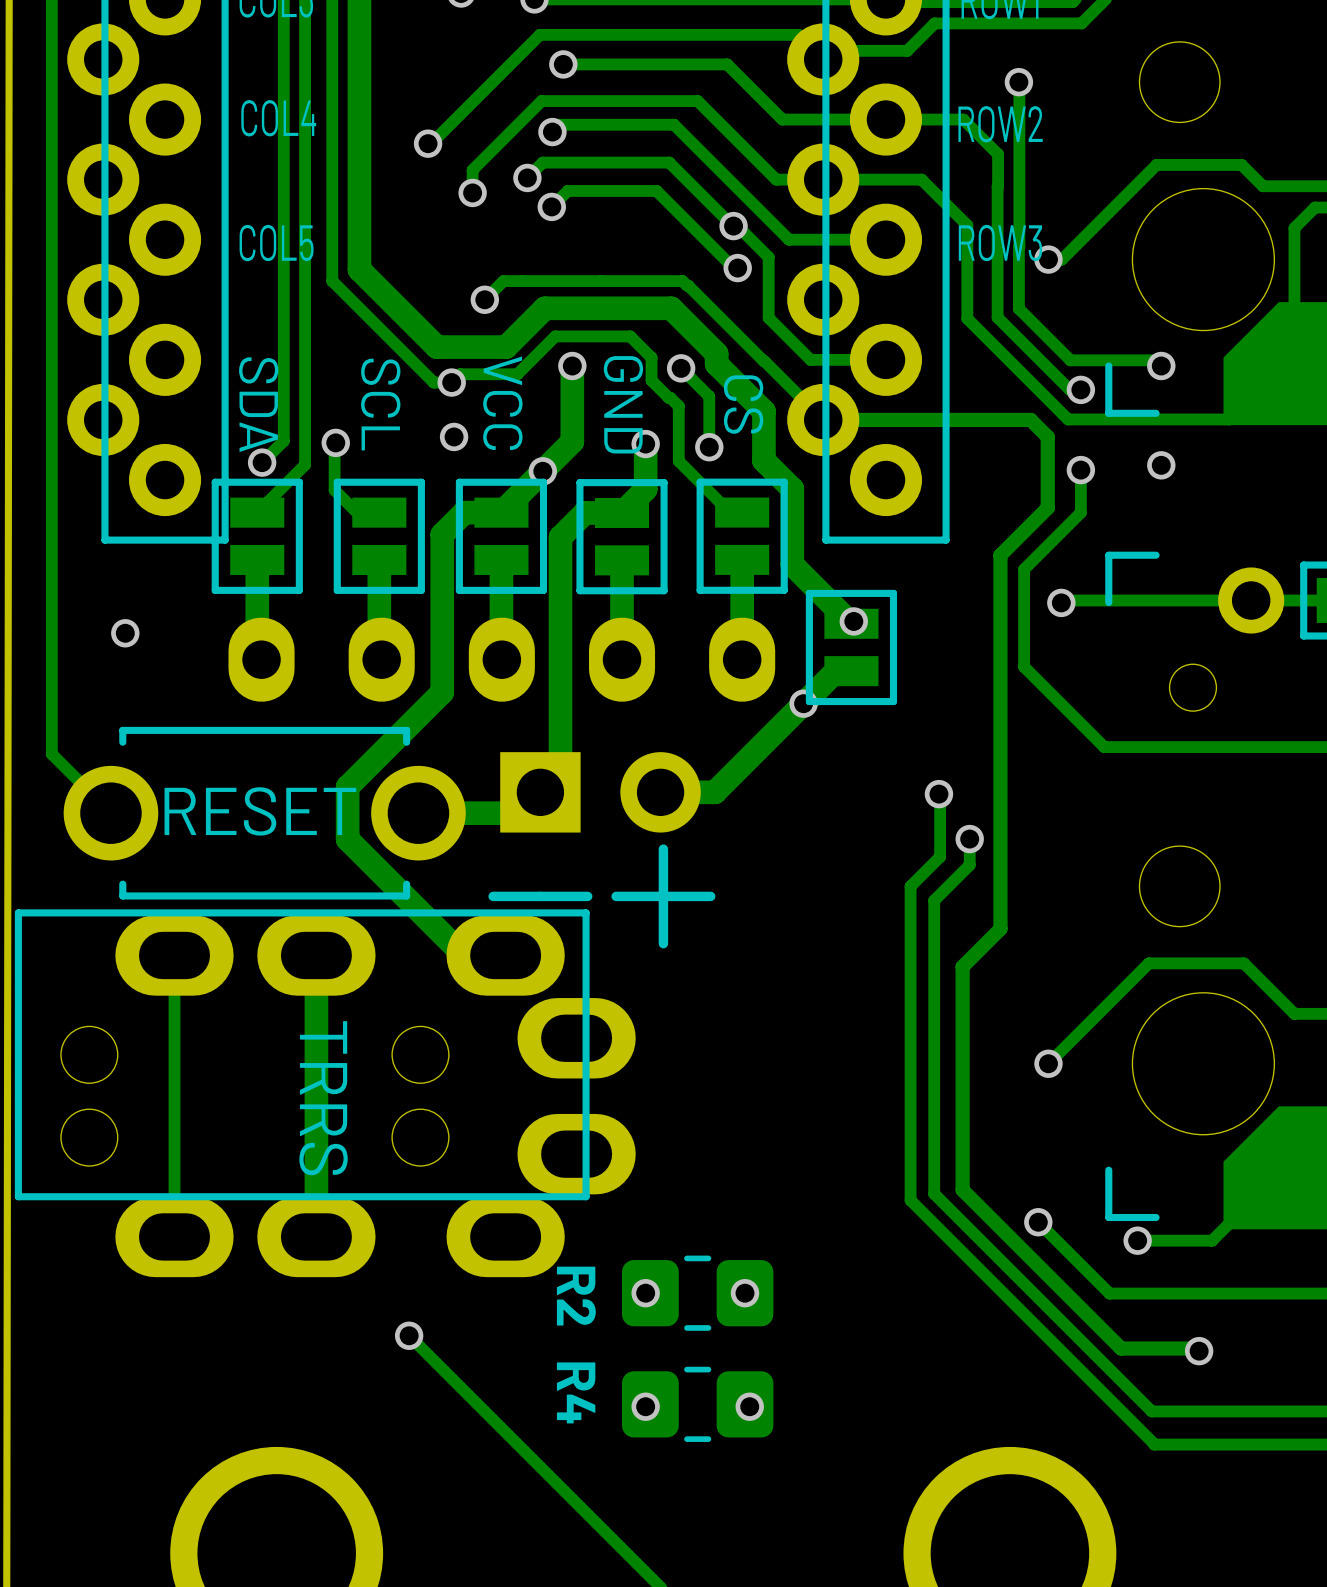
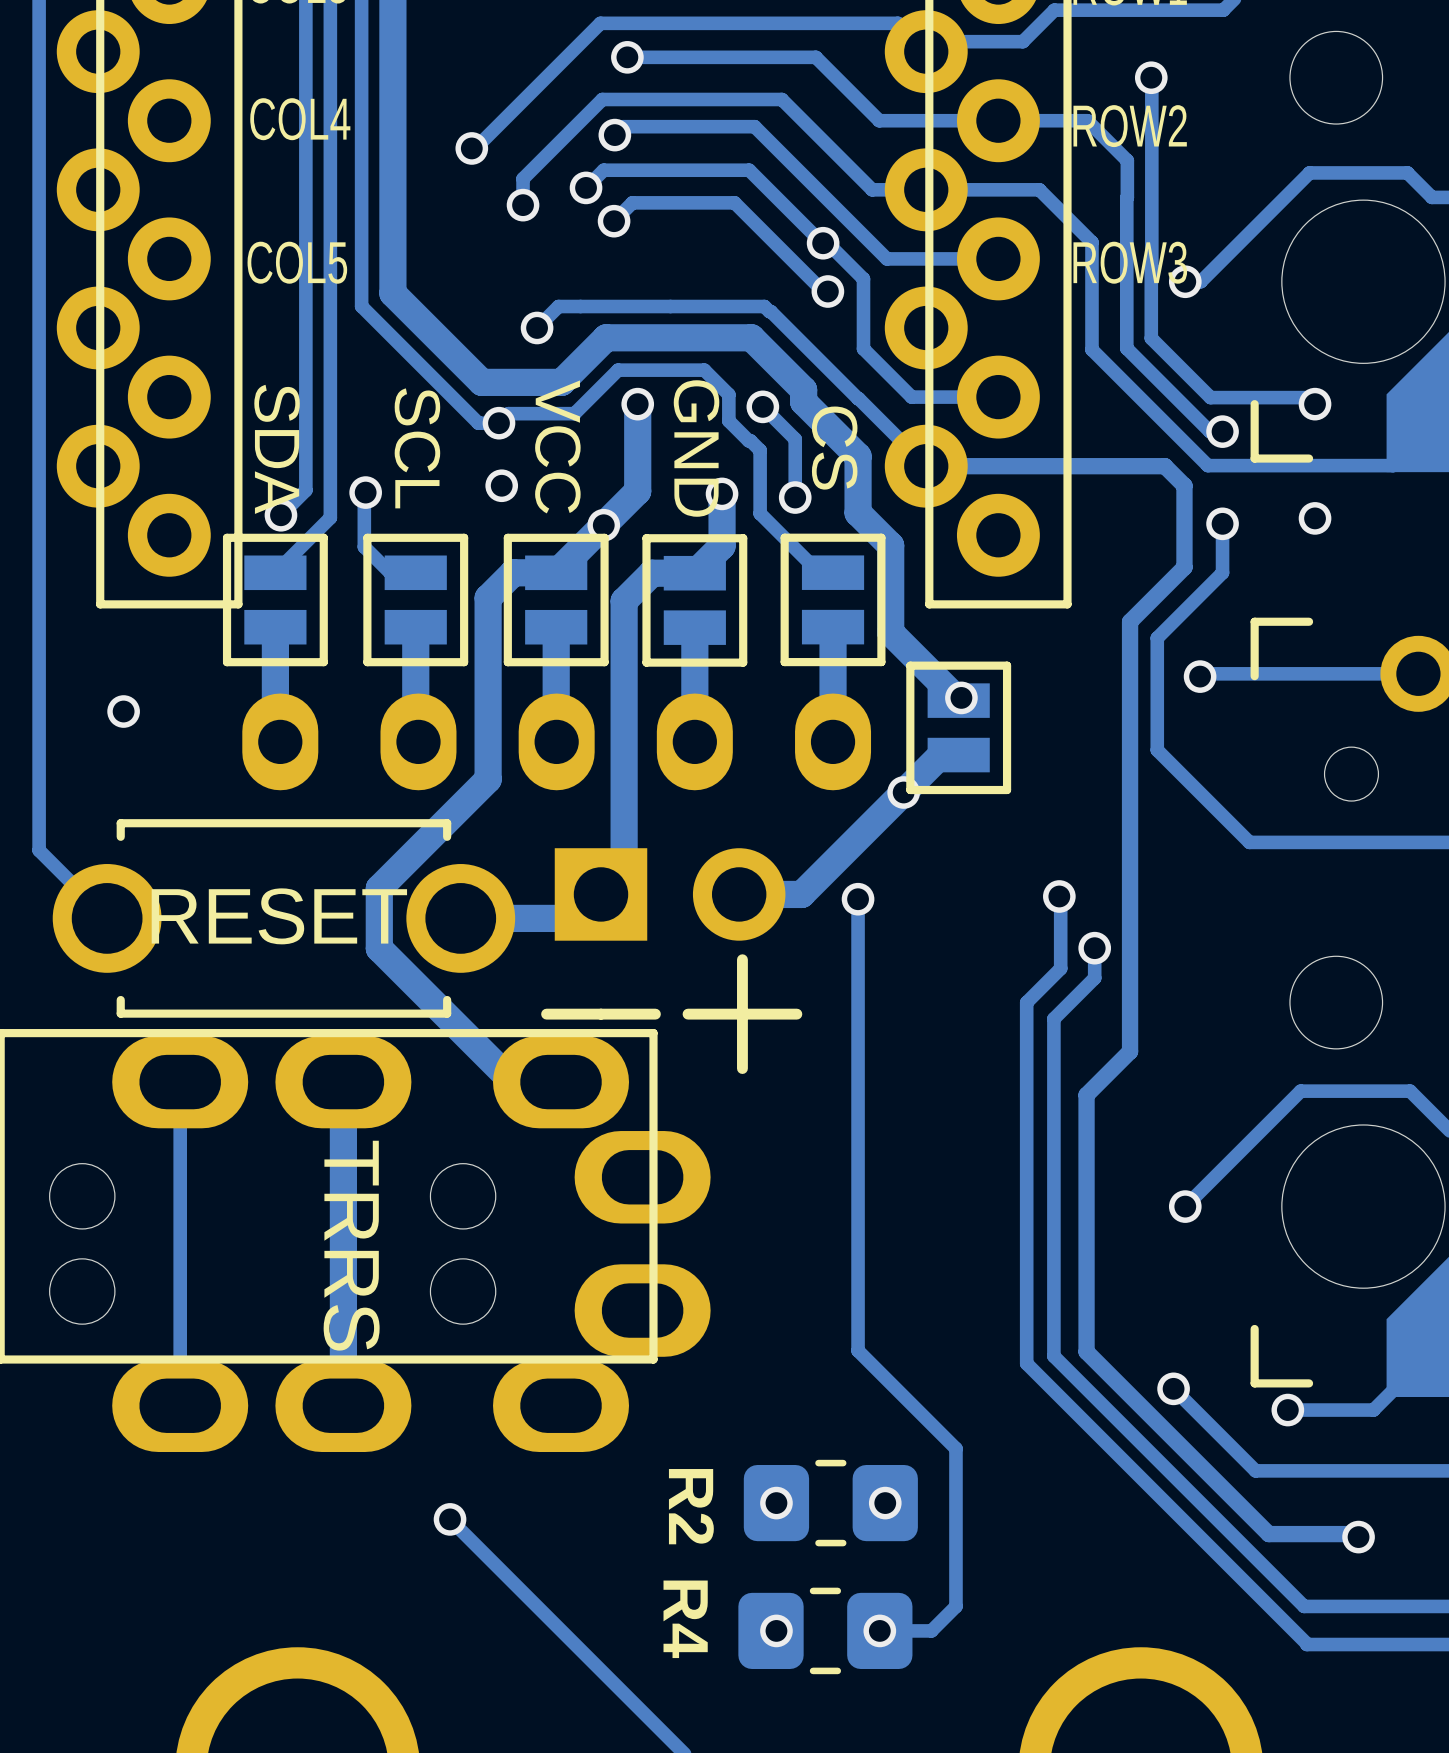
track: none -> (858, 899) (858, 1350) (955, 1448) (955, 1606) (931, 1630) (879, 1630)
via: none -> (858, 899)
via: (645, 1293) -> none
R2 position: (697, 1293) -> (830, 1503)
via: (745, 1293) -> none
via: none -> (776, 1503)
via: none -> (885, 1503)
R4 position: (697, 1404) -> (825, 1630)
via: (645, 1406) -> none
via: (749, 1406) -> none
via: none -> (776, 1630)
via: none -> (879, 1630)

